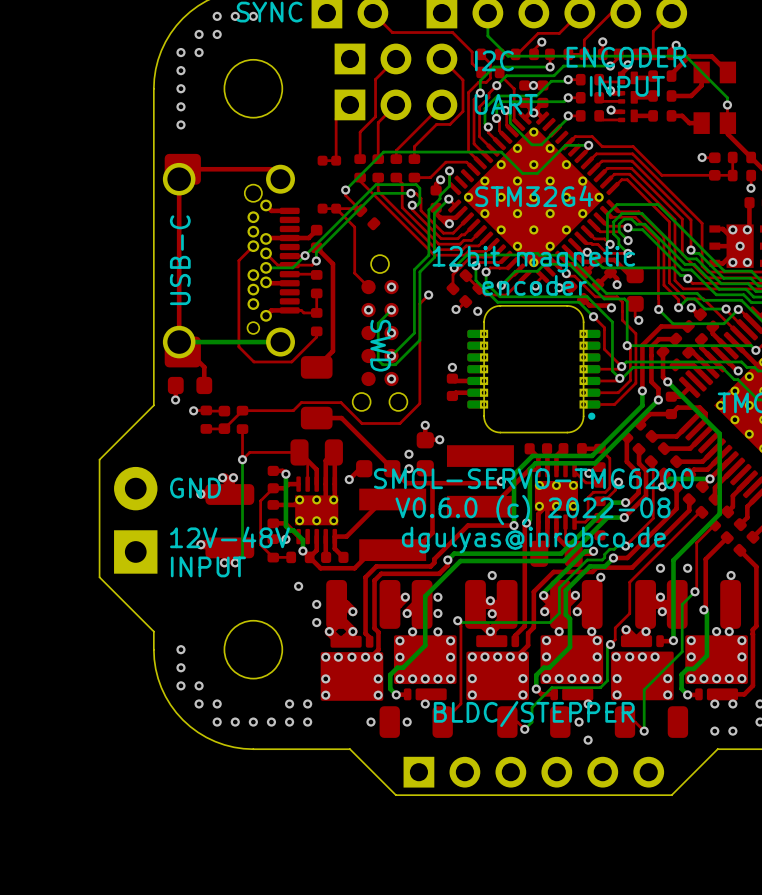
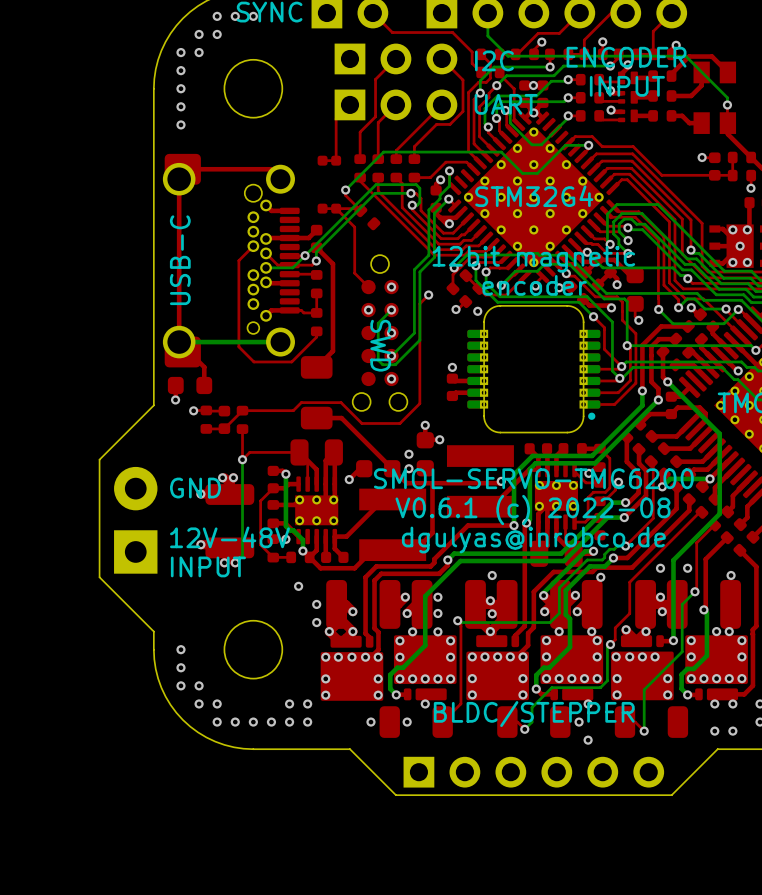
text: V0.6.0 (c) 2022-08 (532, 510) -> V0.6.1 (c) 2022-08 (532, 510)

